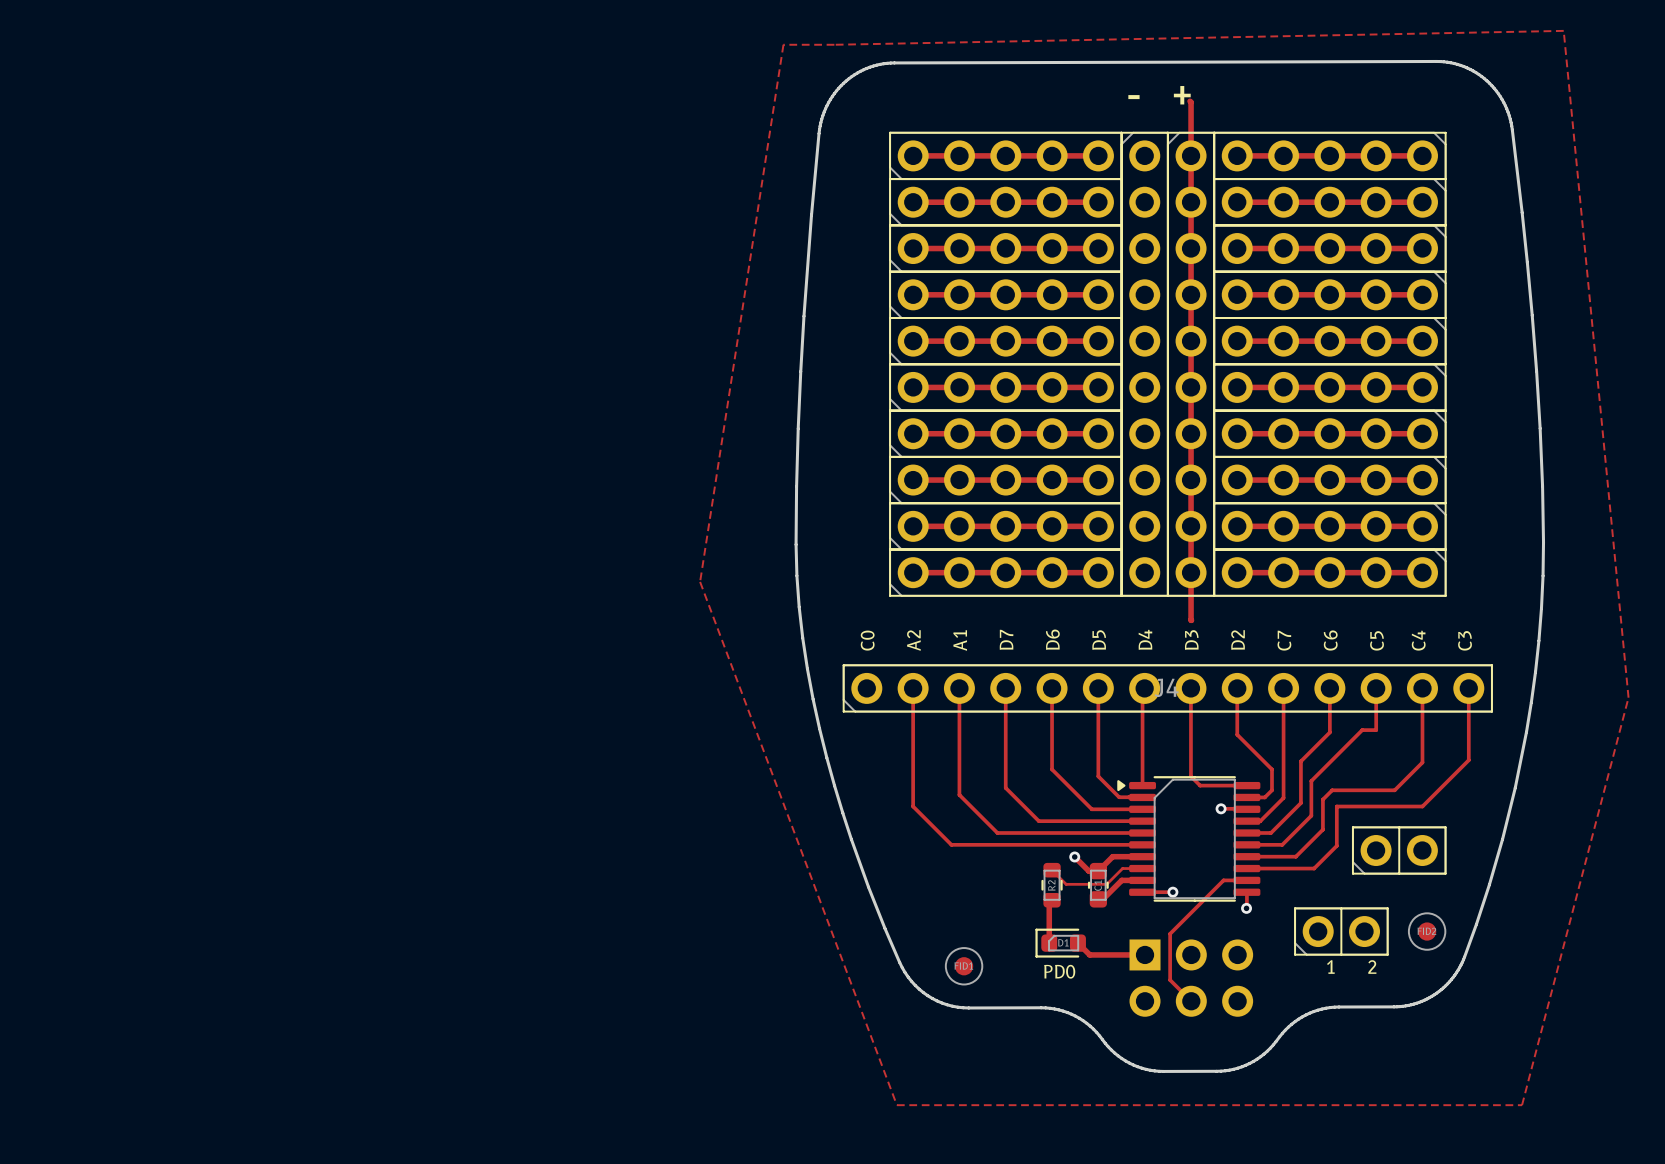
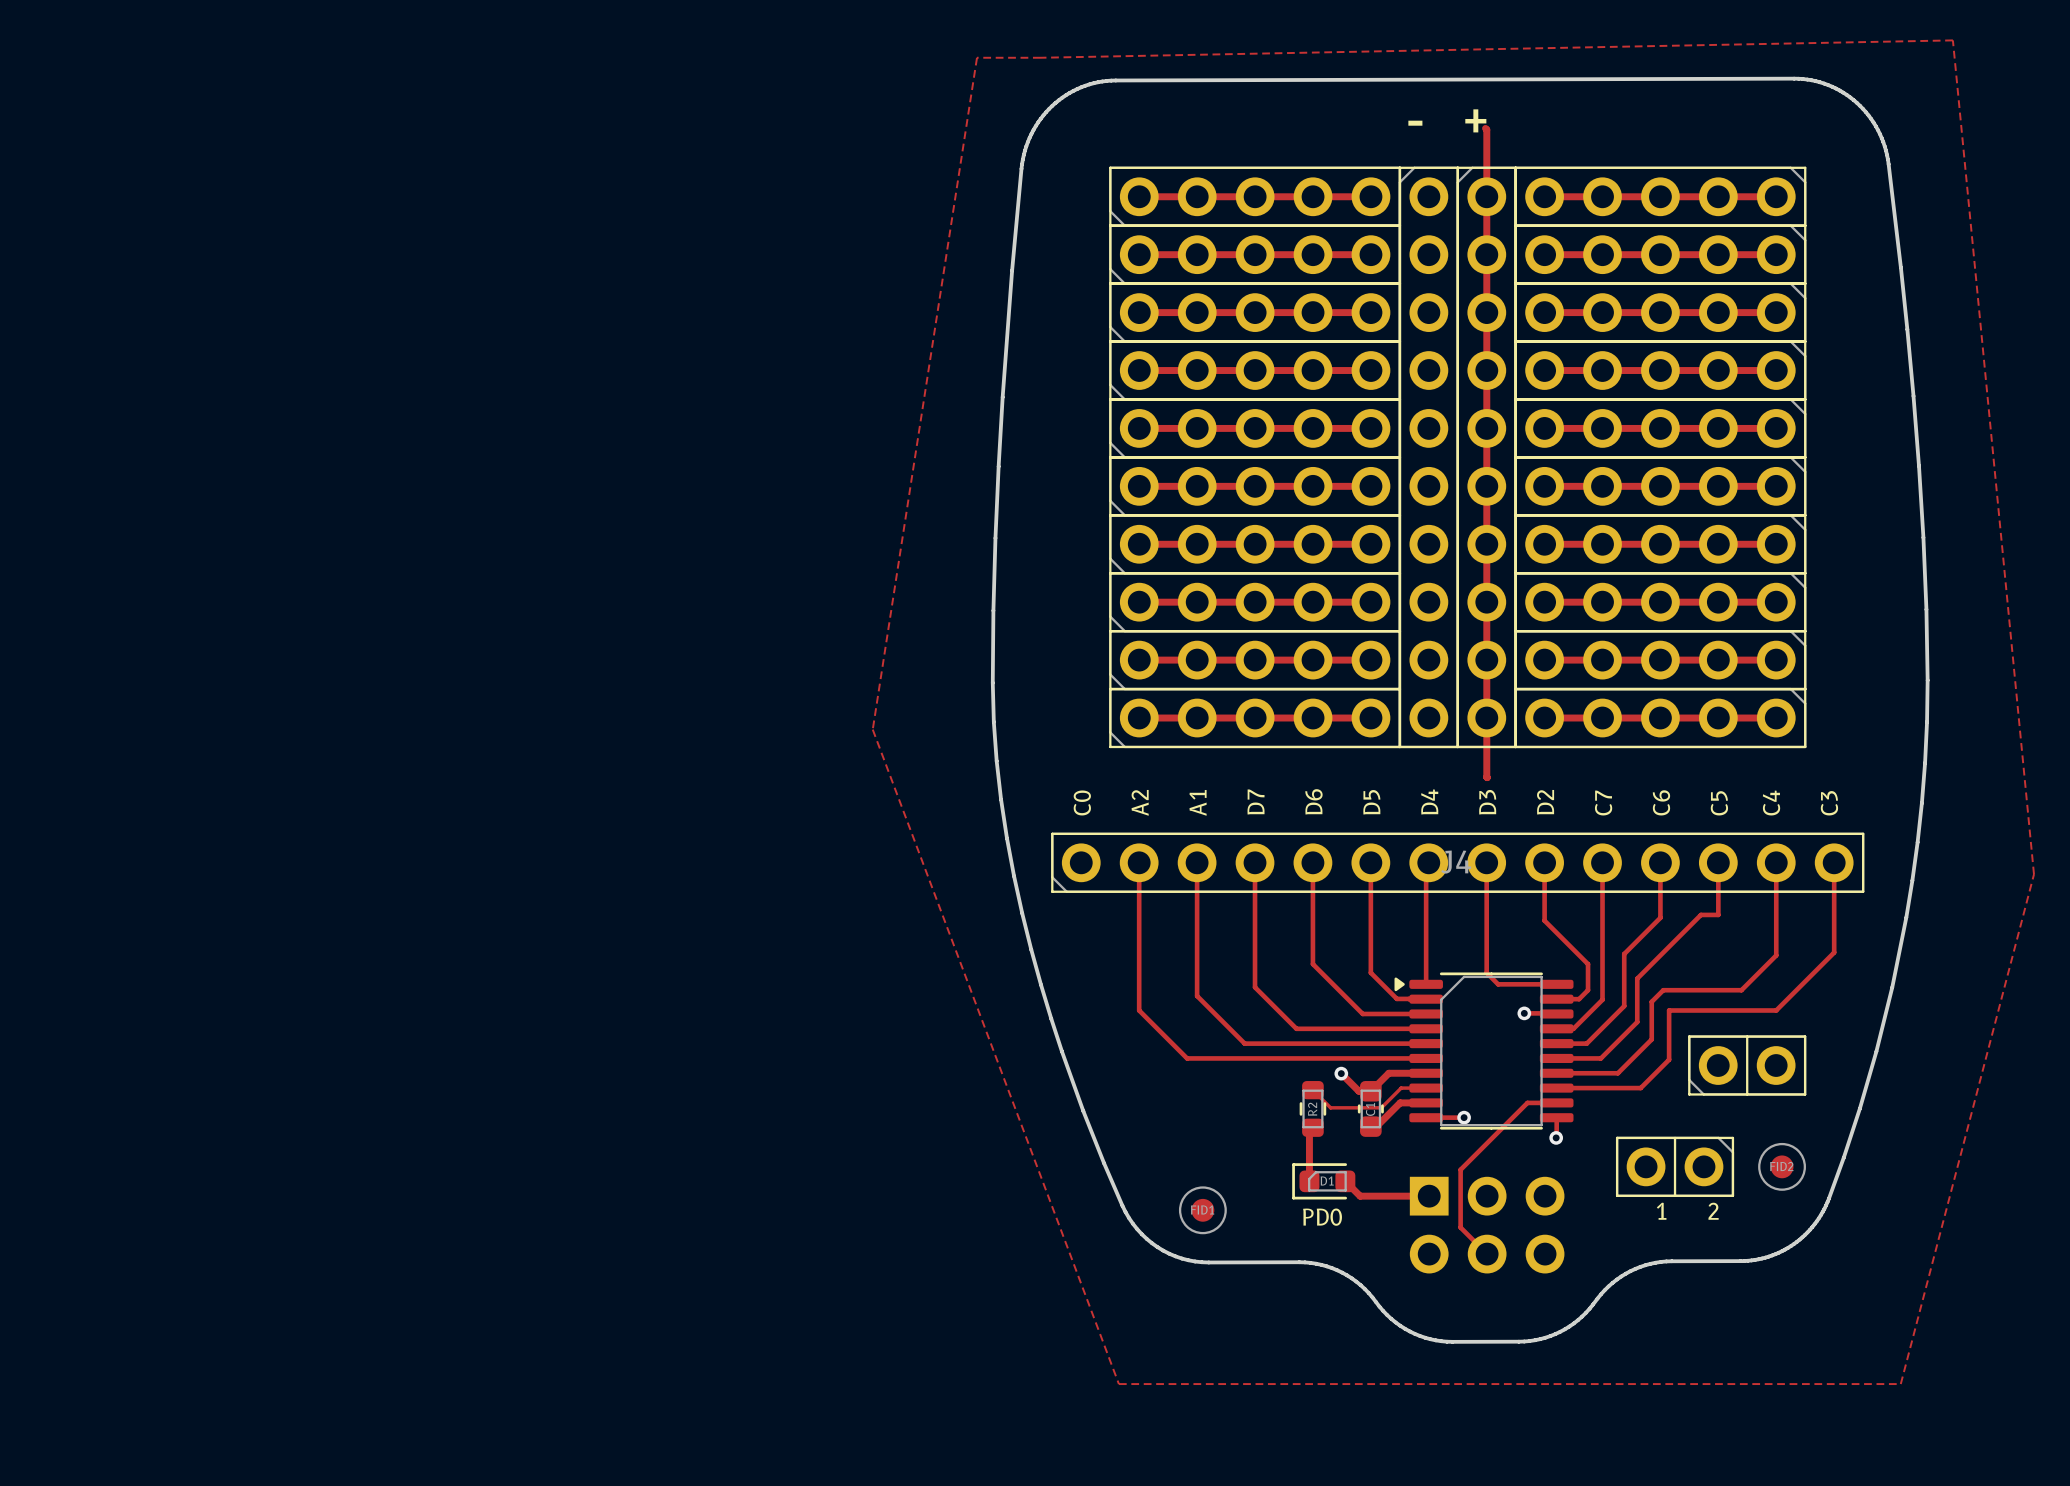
part rotation: 0° (1341, 931) -> 180° (1675, 1166)

